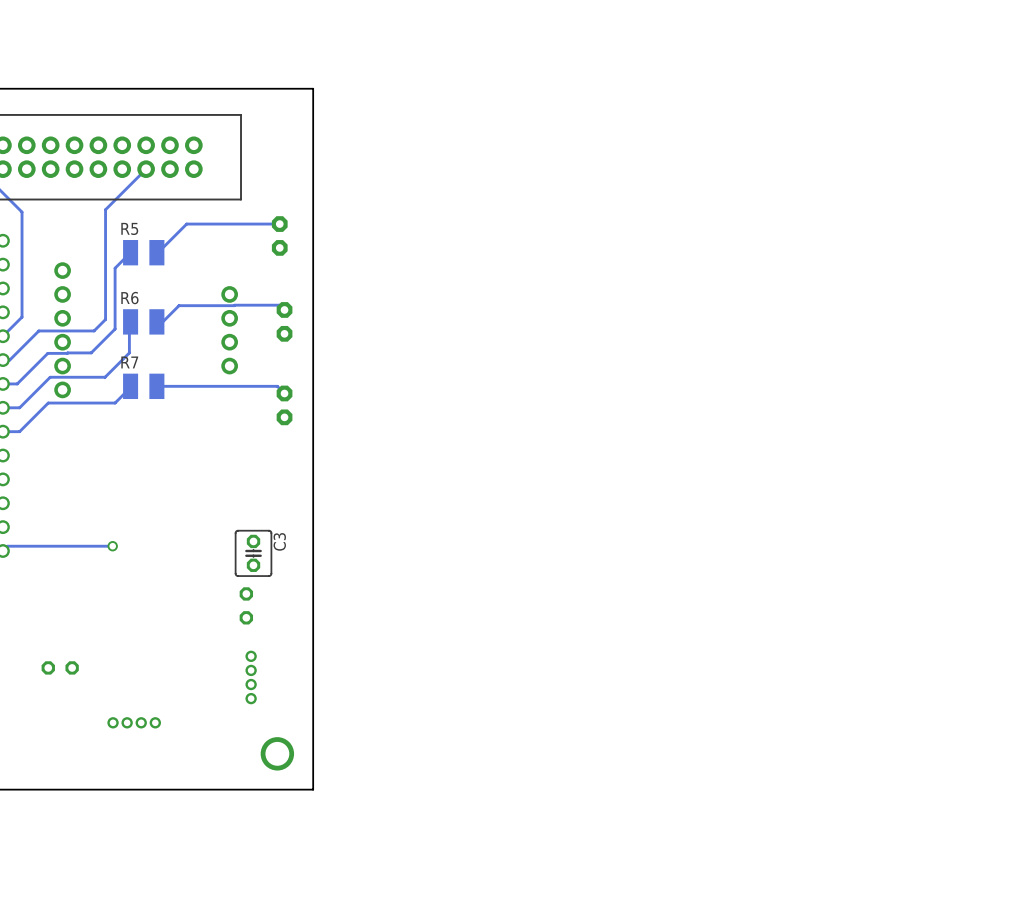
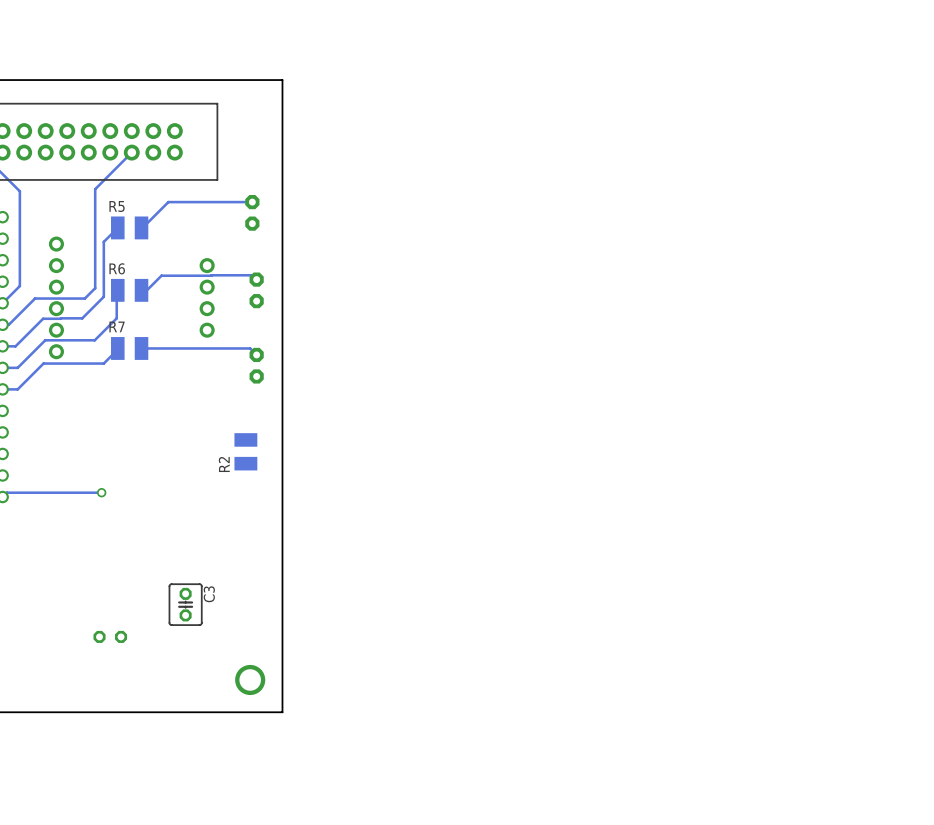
R2: none -> (245, 451)
C3 position: (253, 553) -> (185, 604)
part: (246, 605) -> none
part position: (60, 667) -> (110, 636)
part: (251, 677) -> none
part: (134, 722) -> none

